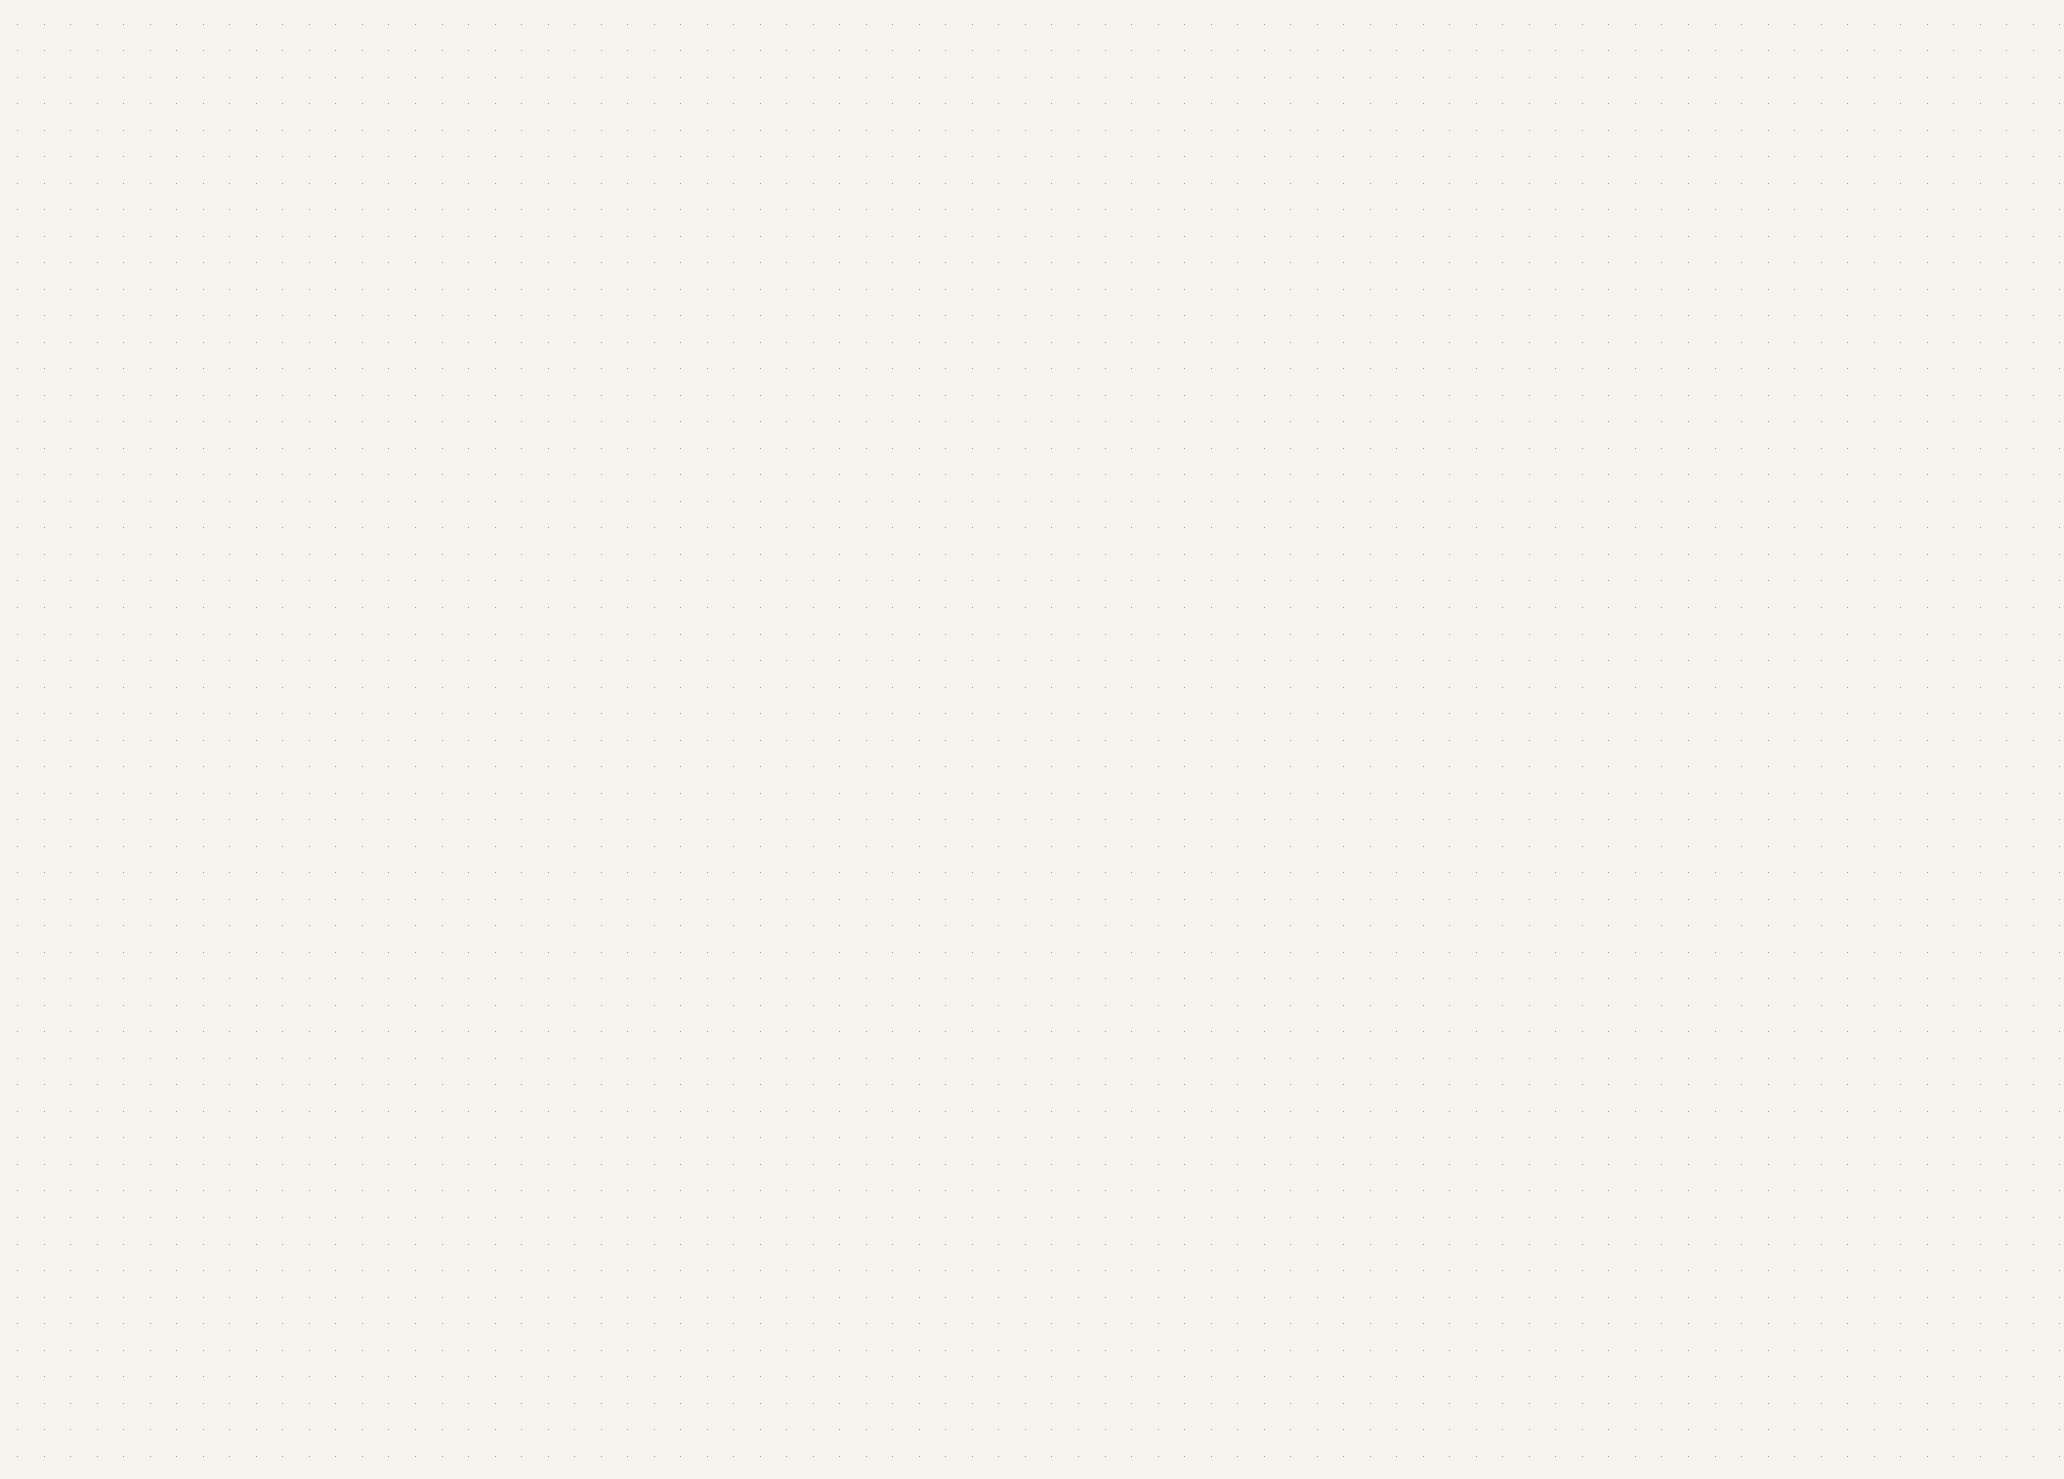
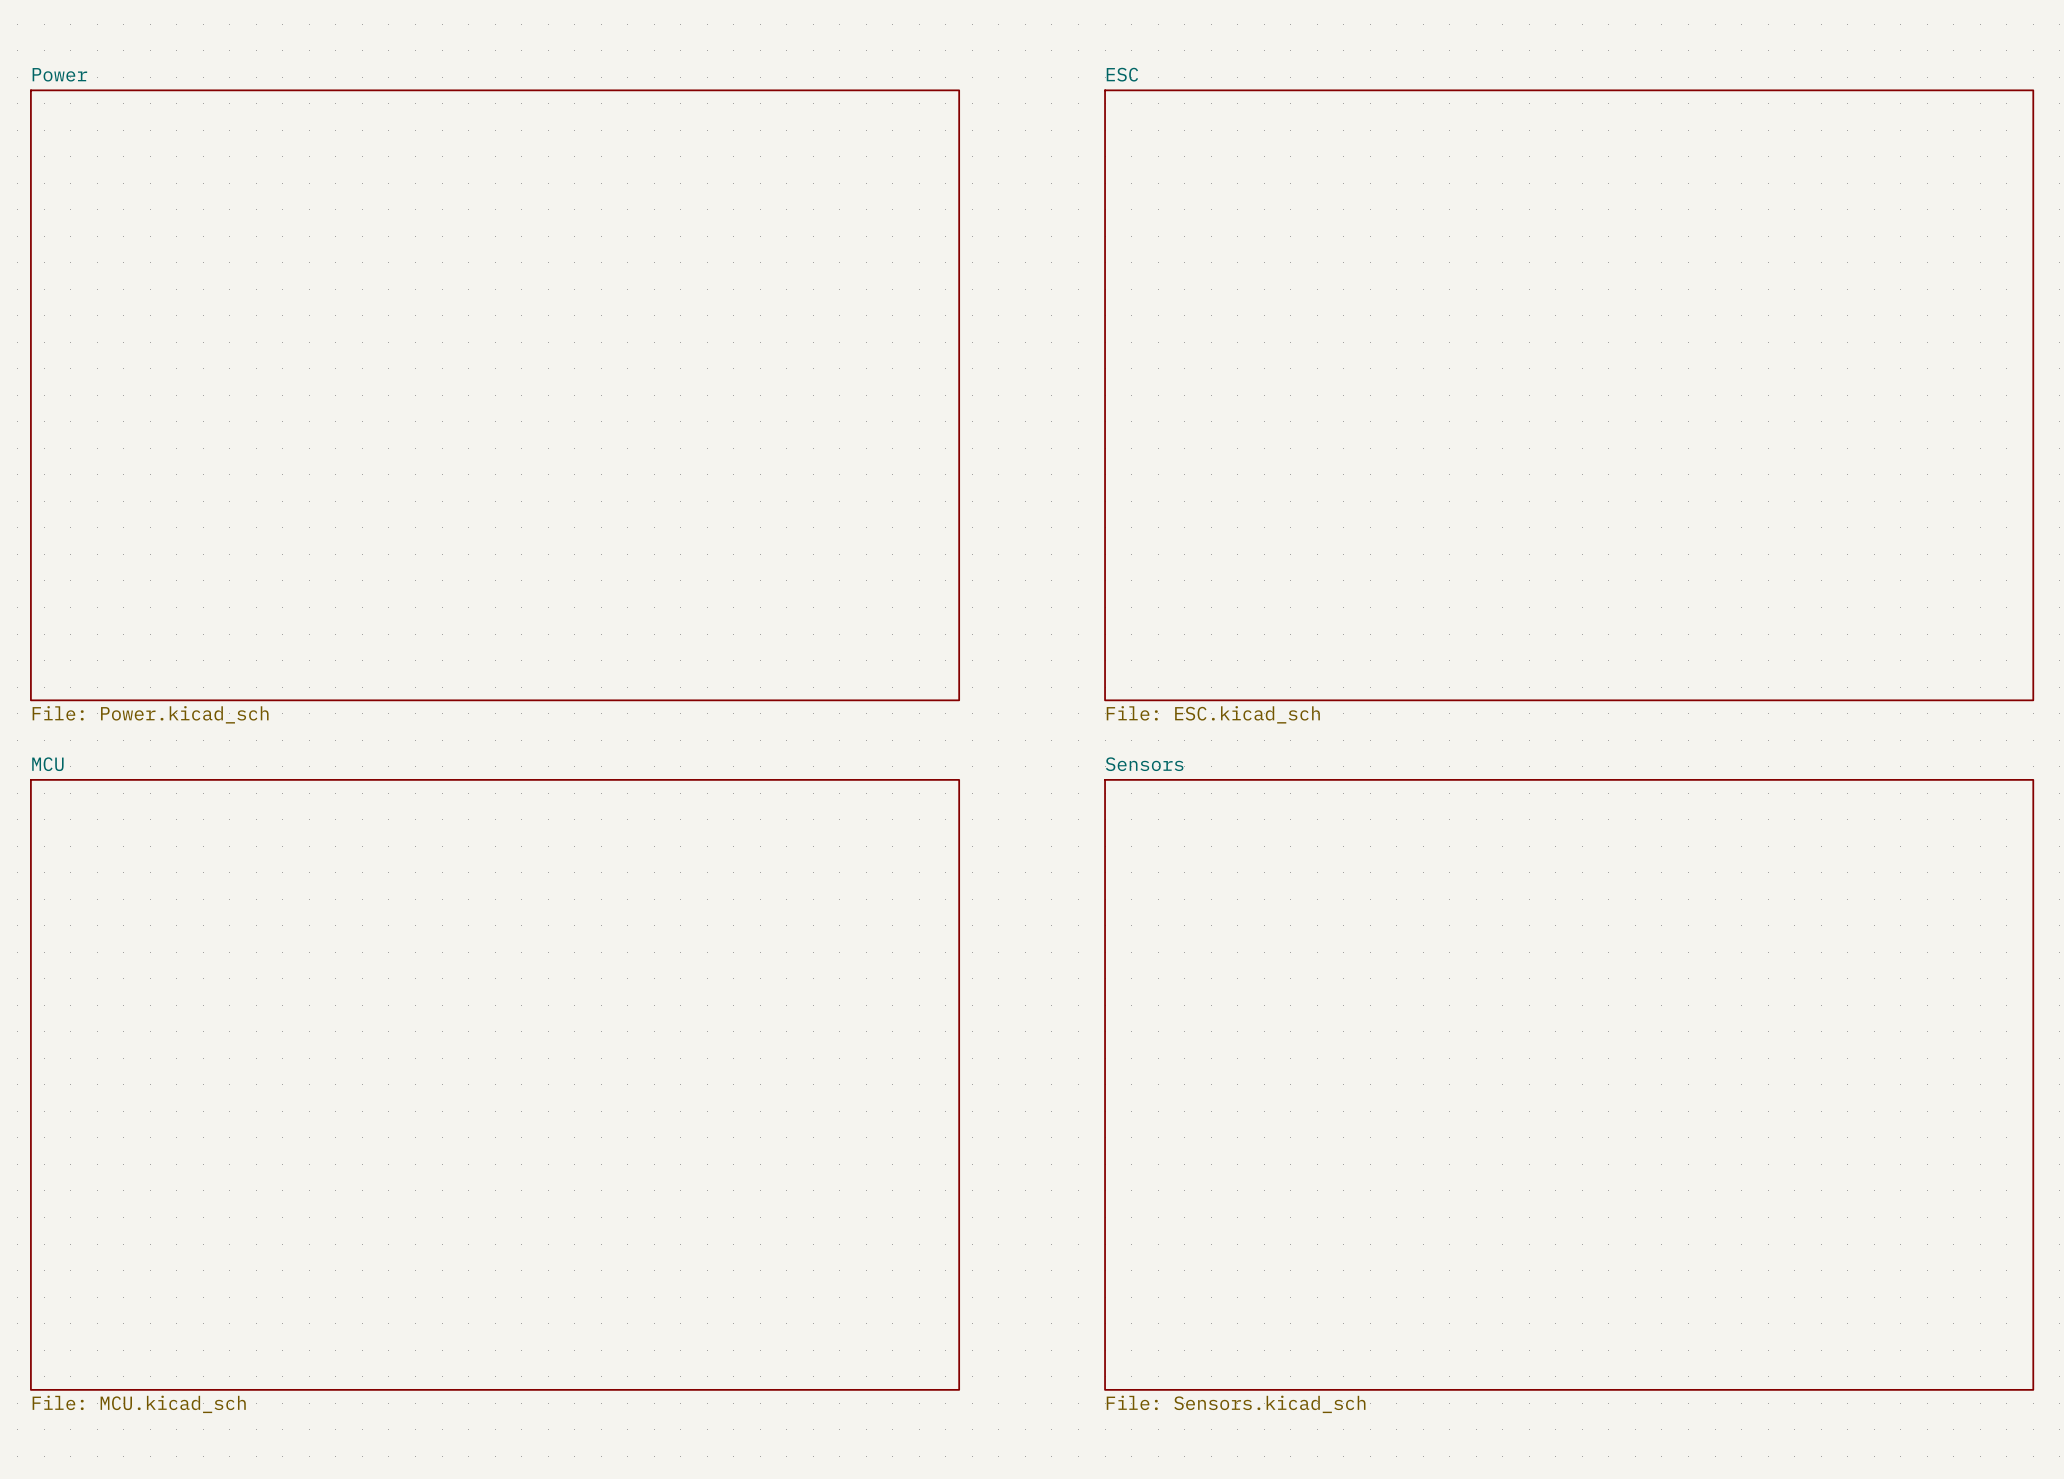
sheet Power: none -> File: Power.kicad_sch (495, 395)
sheet ESC: none -> File: ESC.kicad_sch (1569, 395)
sheet MCU: none -> File: MCU.kicad_sch (495, 1084)
sheet Sensors: none -> File: Sensors.kicad_sch (1569, 1084)

